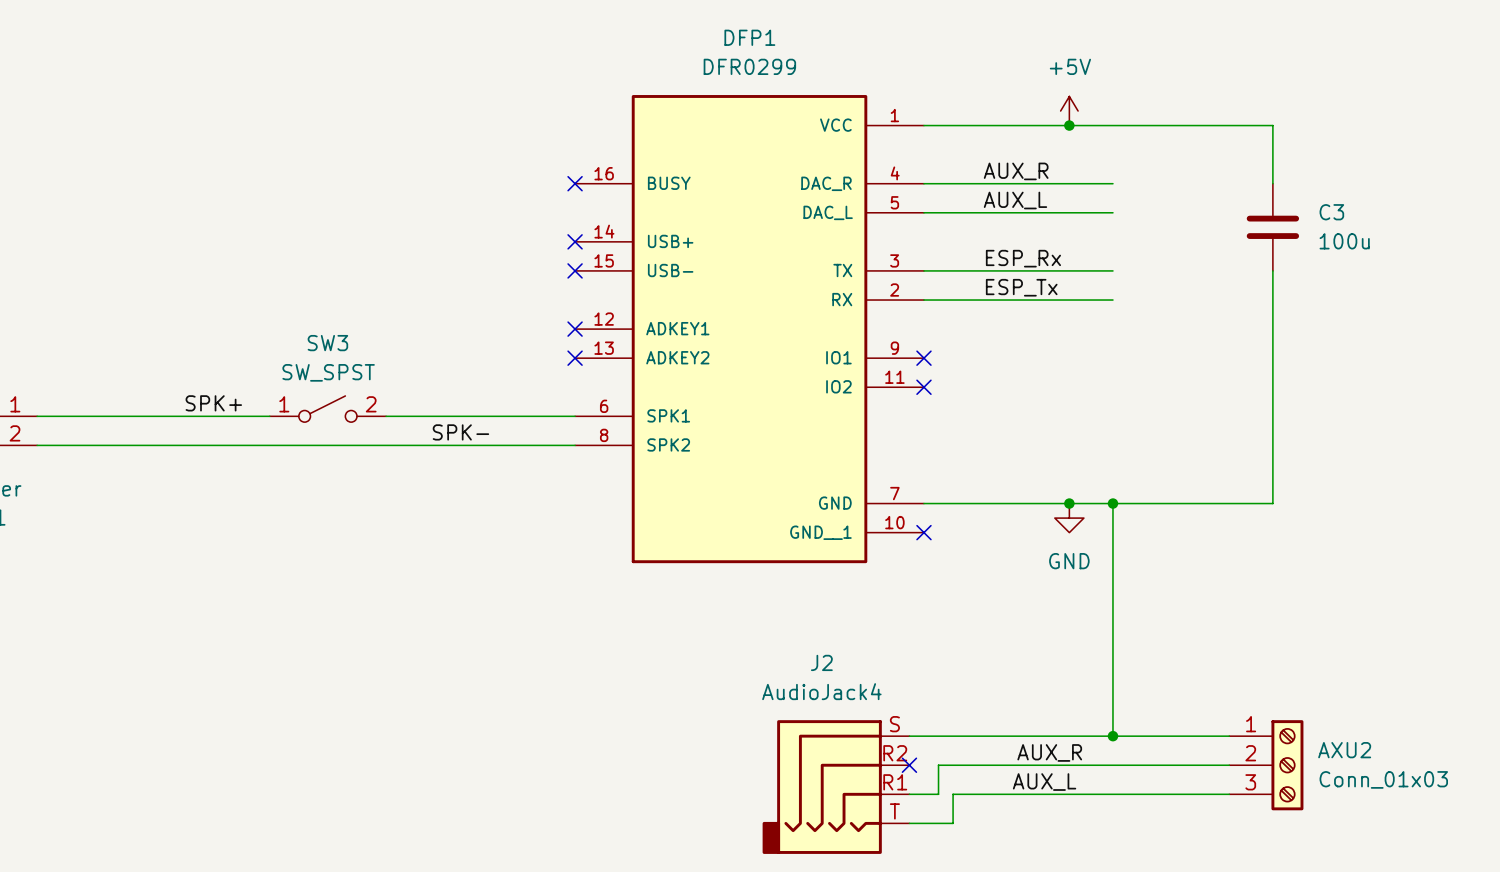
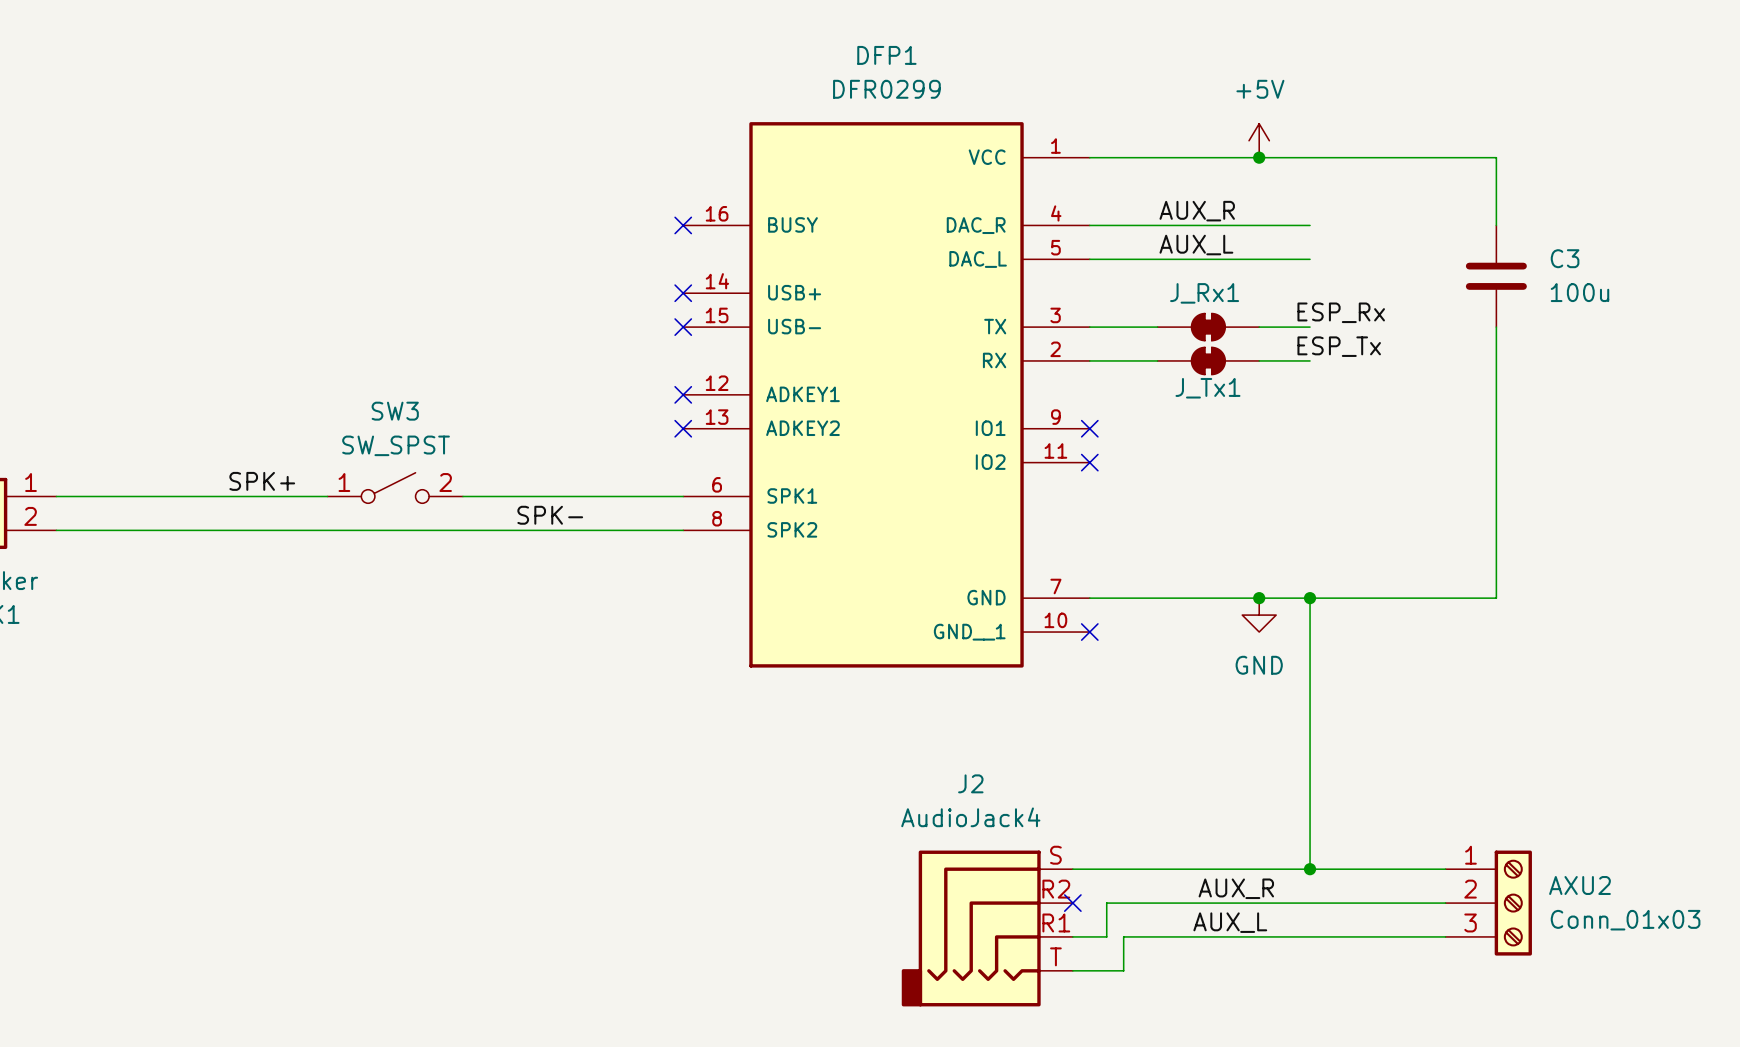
label position: ESP_Rx (1023, 258) -> ESP_Rx (1341, 312)
J_Rx1: none -> (1208, 327)
label position: ESP_Tx (1021, 287) -> ESP_Tx (1339, 346)
J_Tx1: none -> (1208, 360)

